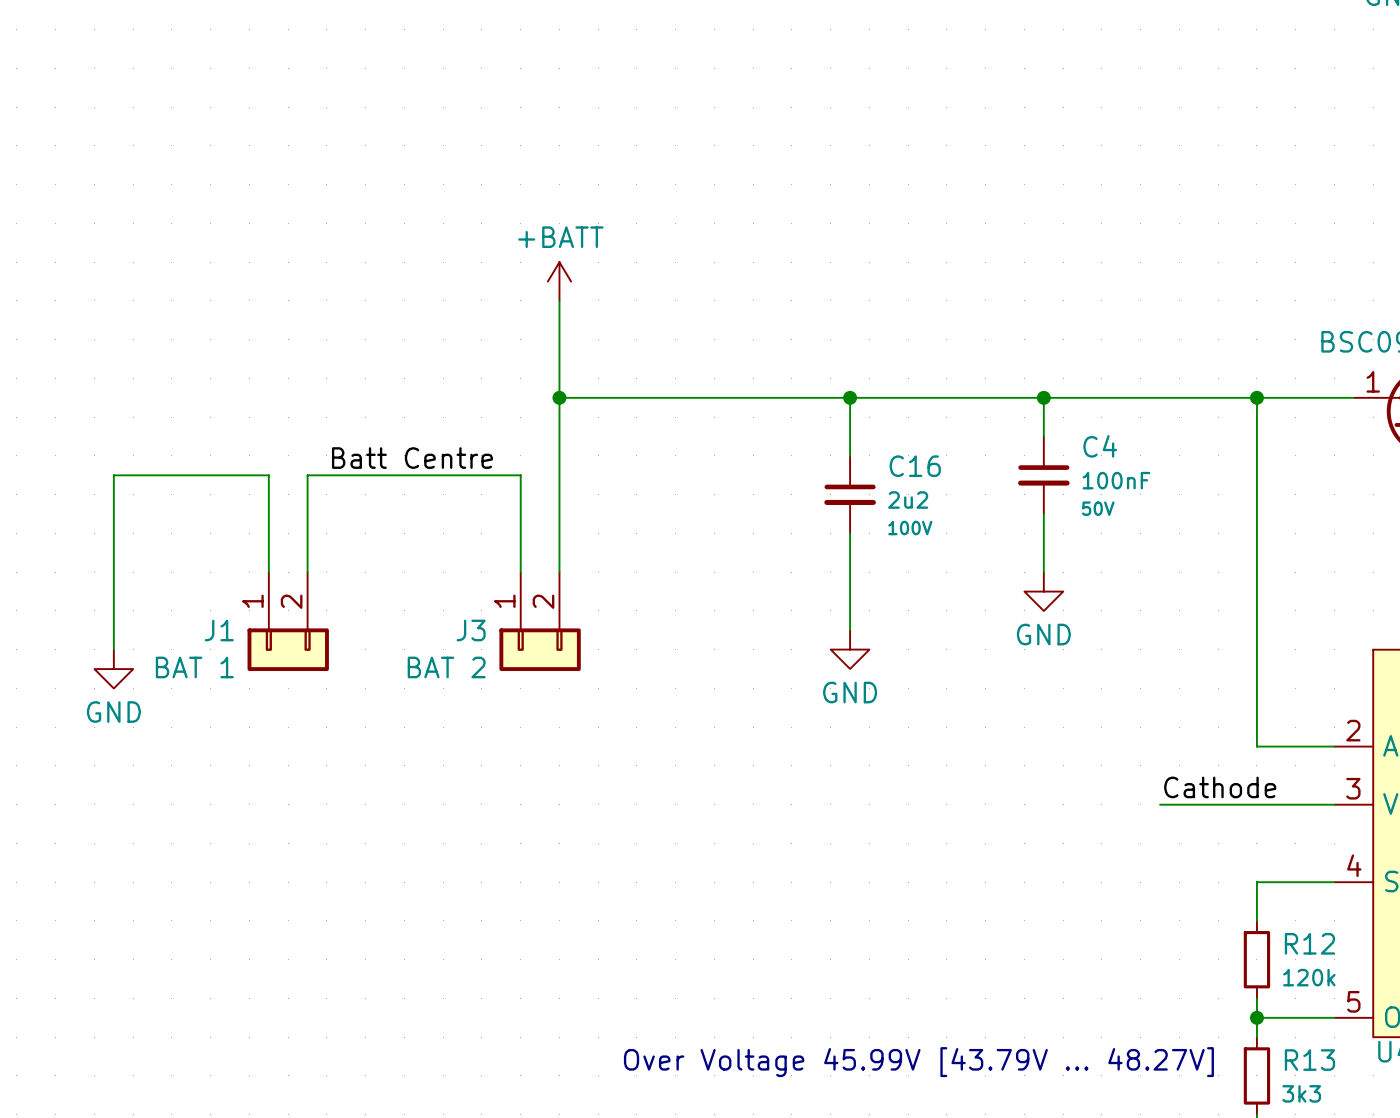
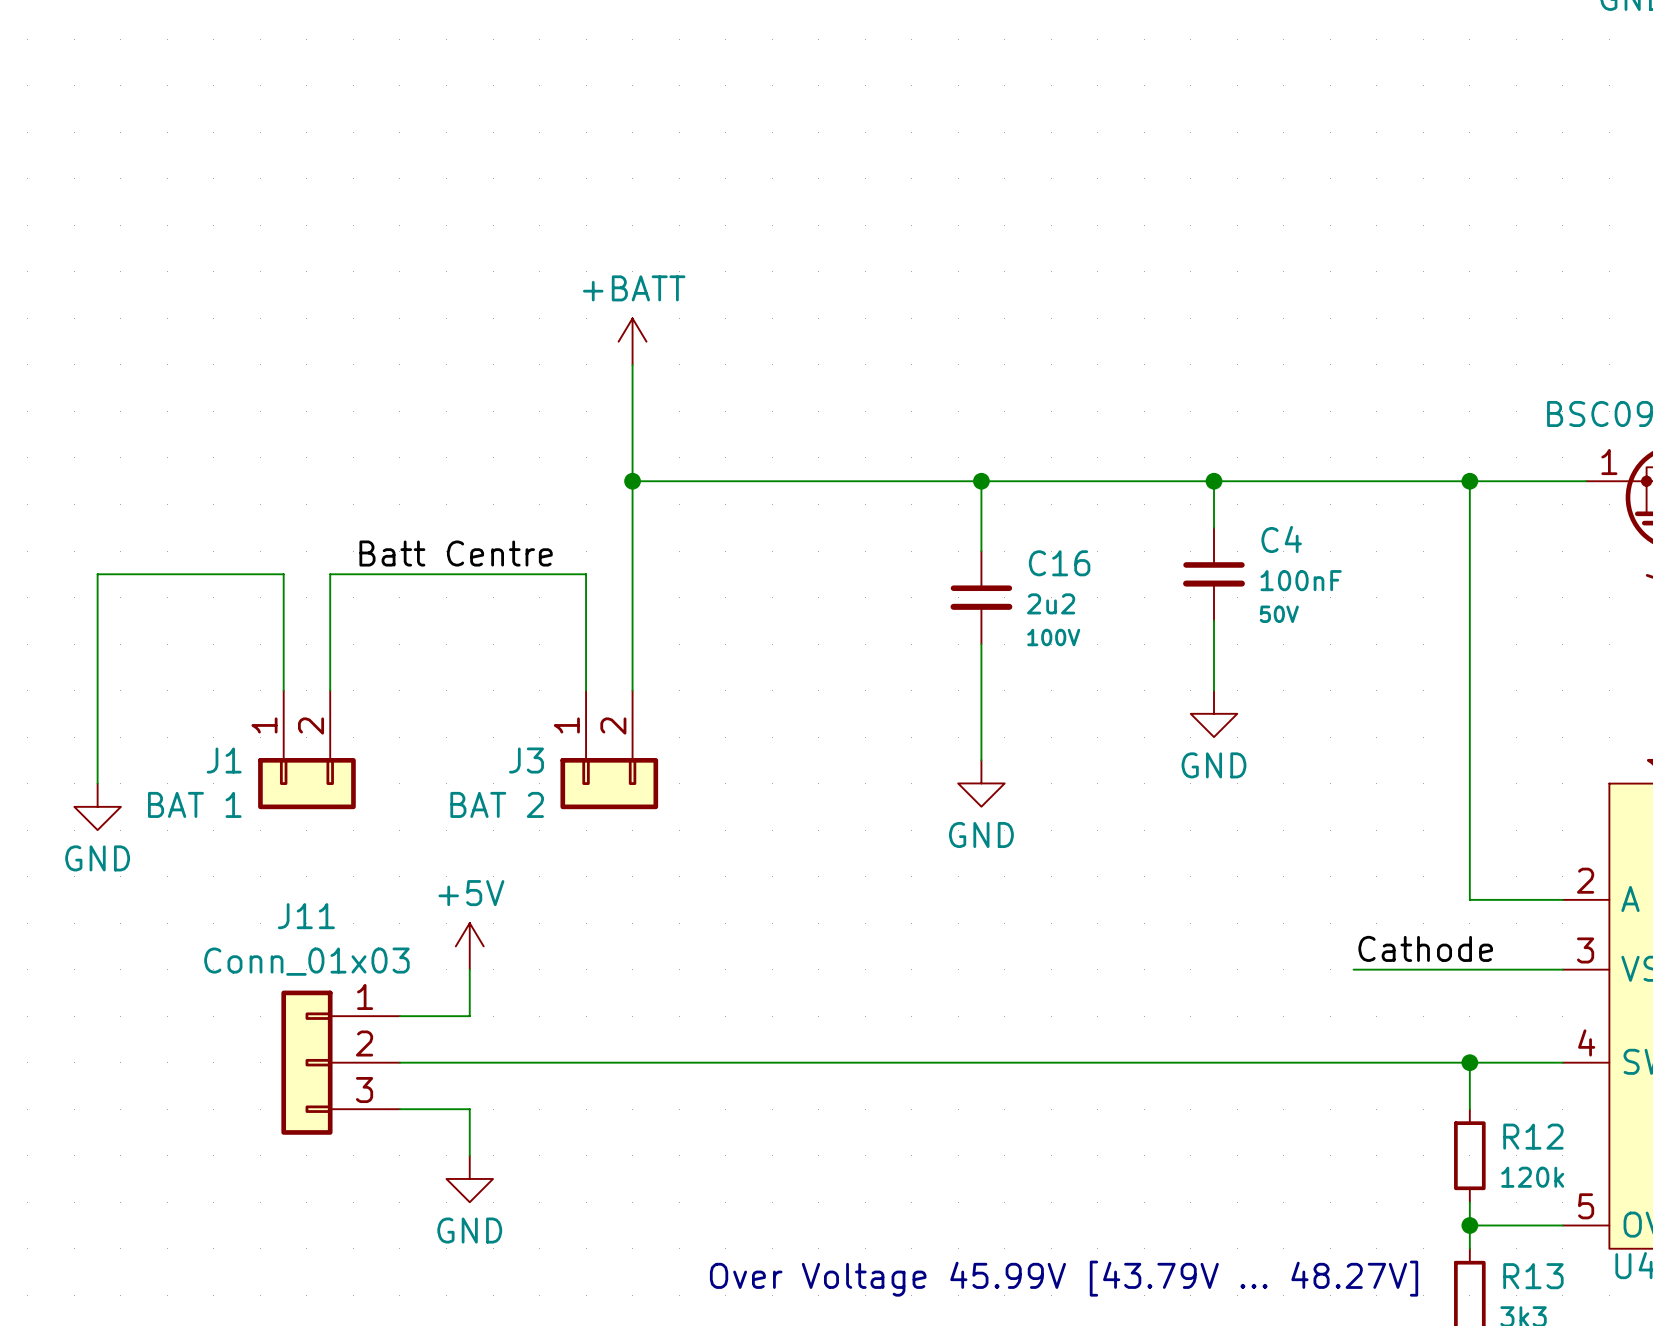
power symbol: none -> +5V (469, 946)
wire: none -> (469, 969) (469, 1016) (399, 1016)
J11: none -> Conn_01x03 (340, 1062)
wire: none -> (399, 1062) (1469, 1062)
junction: none -> (1469, 1062)
wire: none -> (399, 1109) (469, 1109) (469, 1155)
power symbol: none -> GND (469, 1178)

